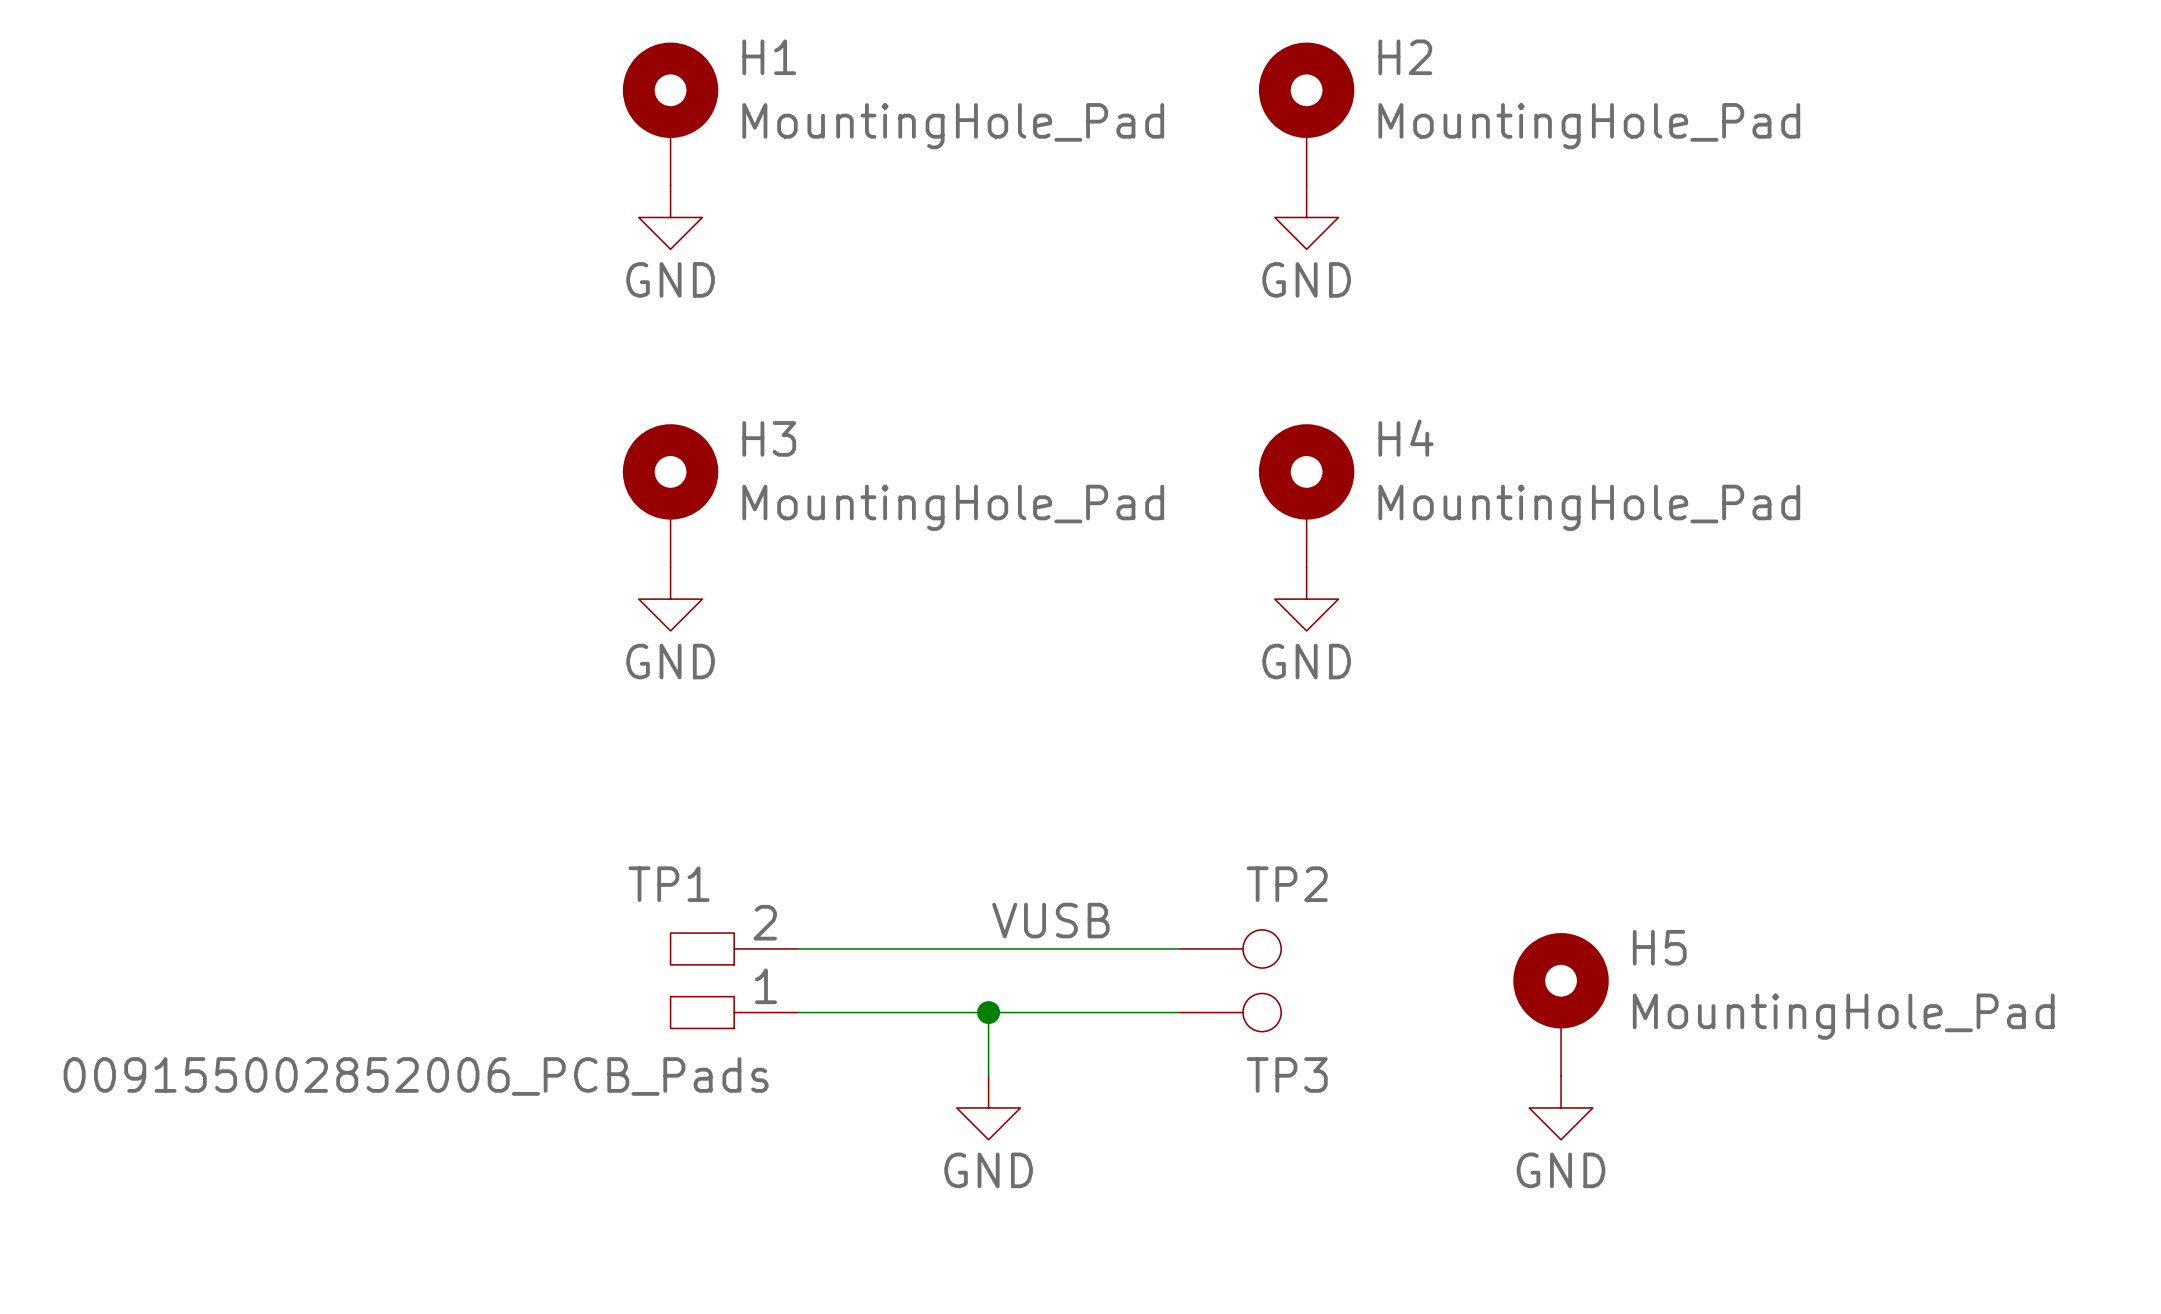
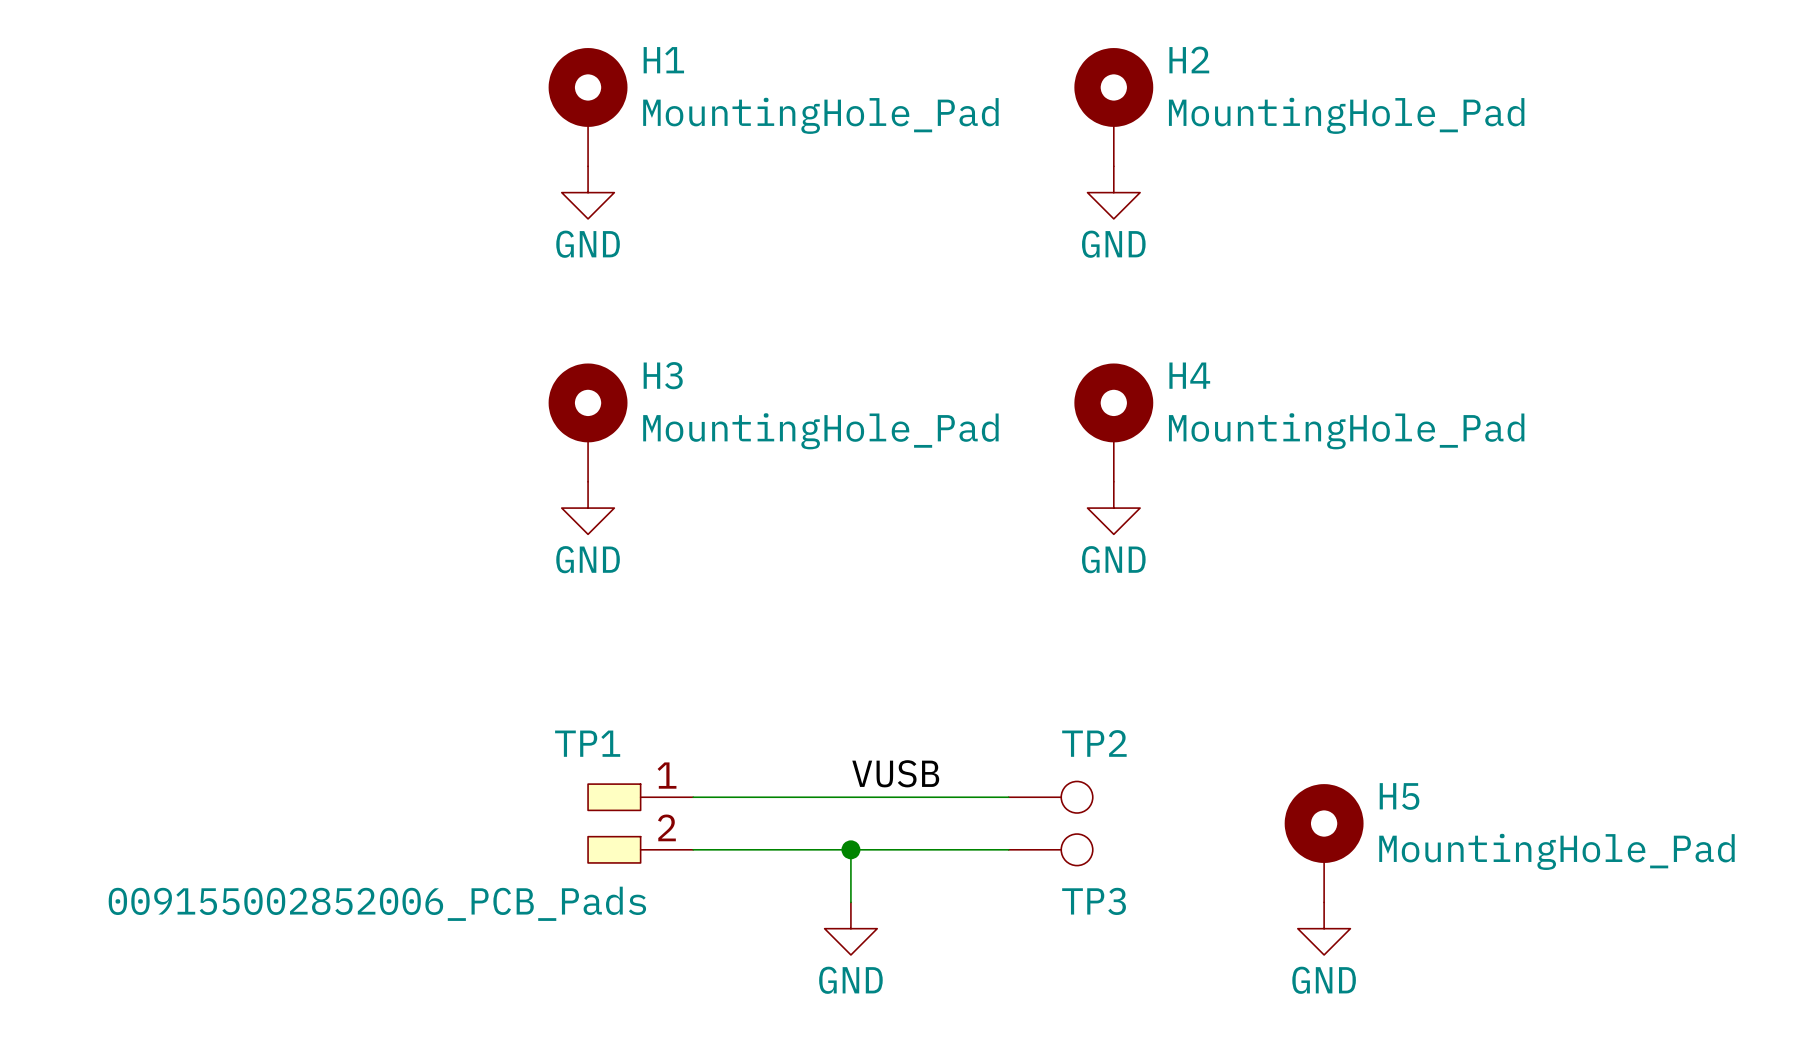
TP1 flip: as is (702, 980) -> up-down (614, 823)

